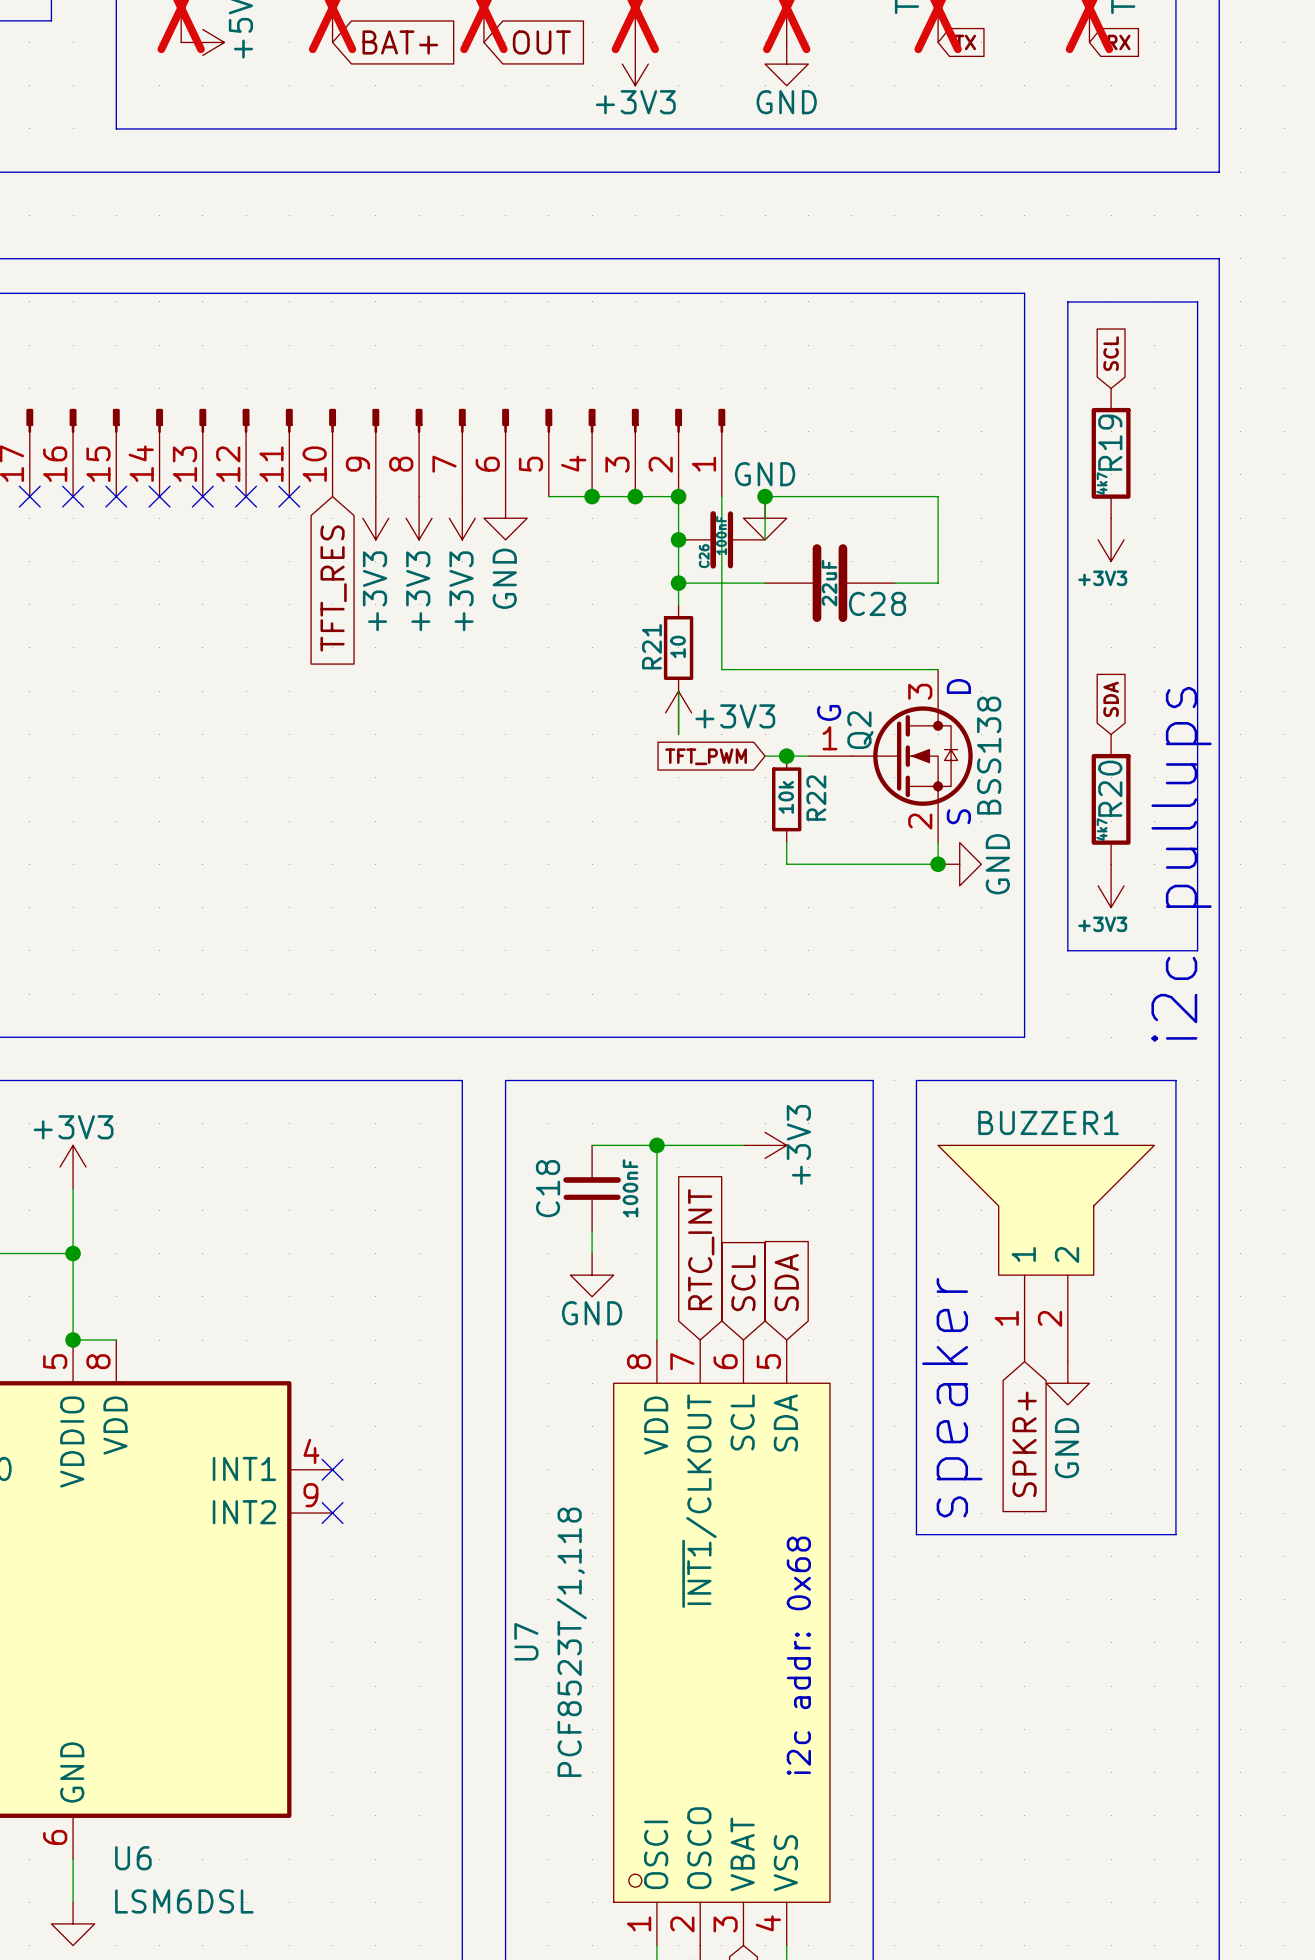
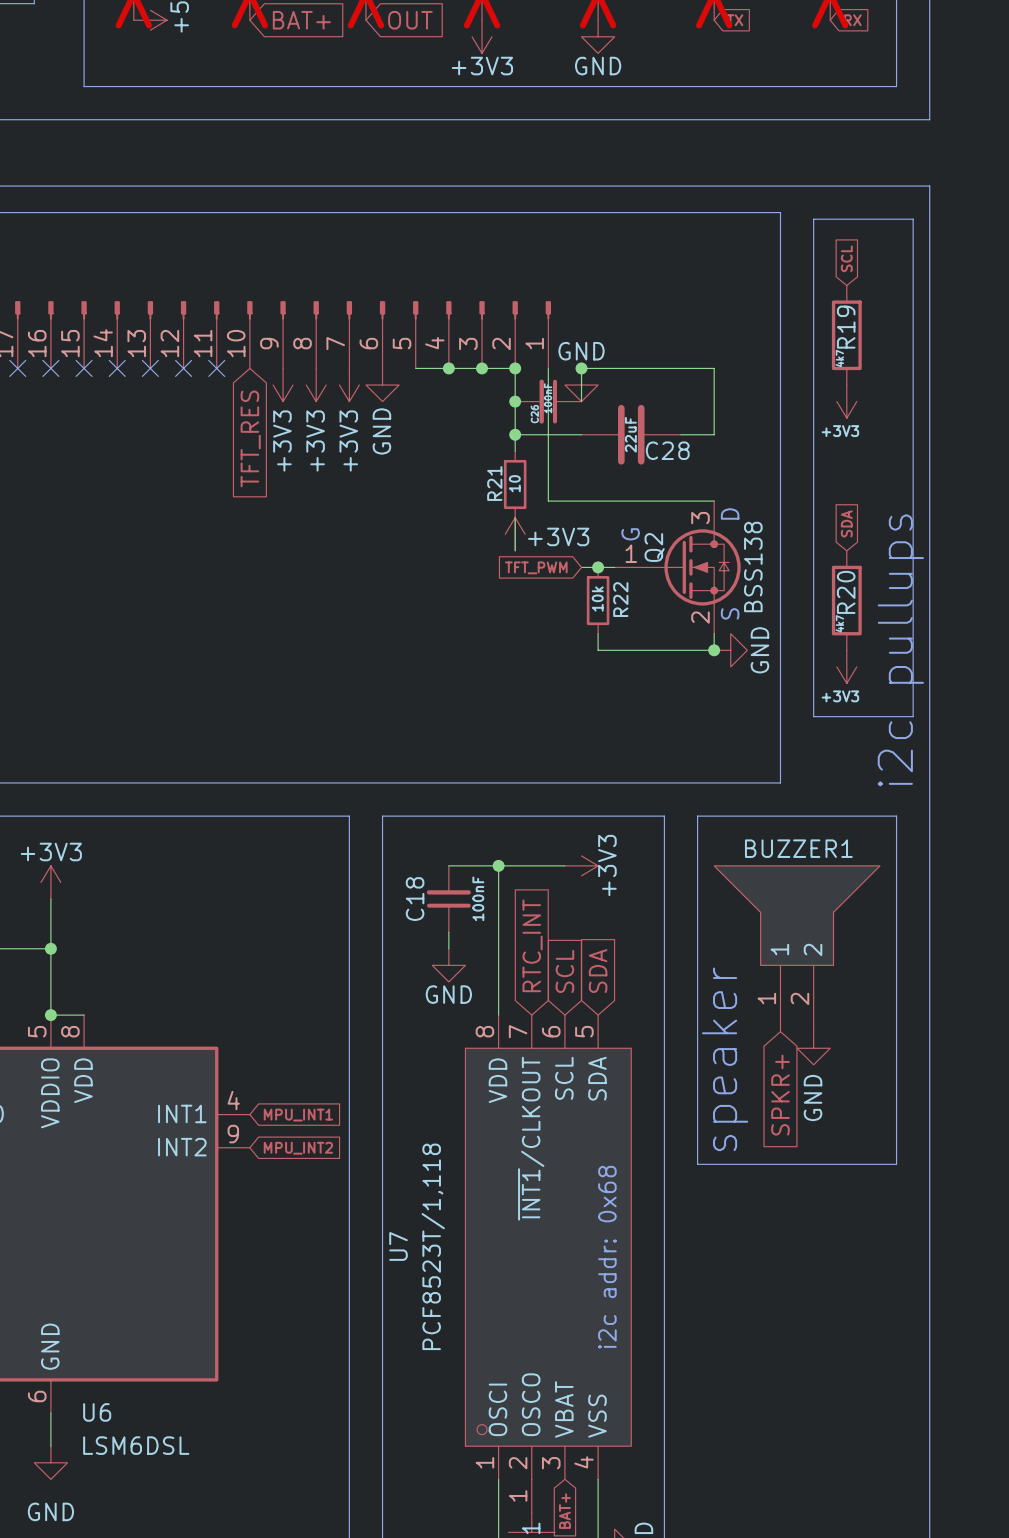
no-connect mark: (332, 1469) -> none
global label: none -> MPU_INT1 (298, 1115)
no-connect mark: (332, 1513) -> none
global label: none -> MPU_INT2 (298, 1148)

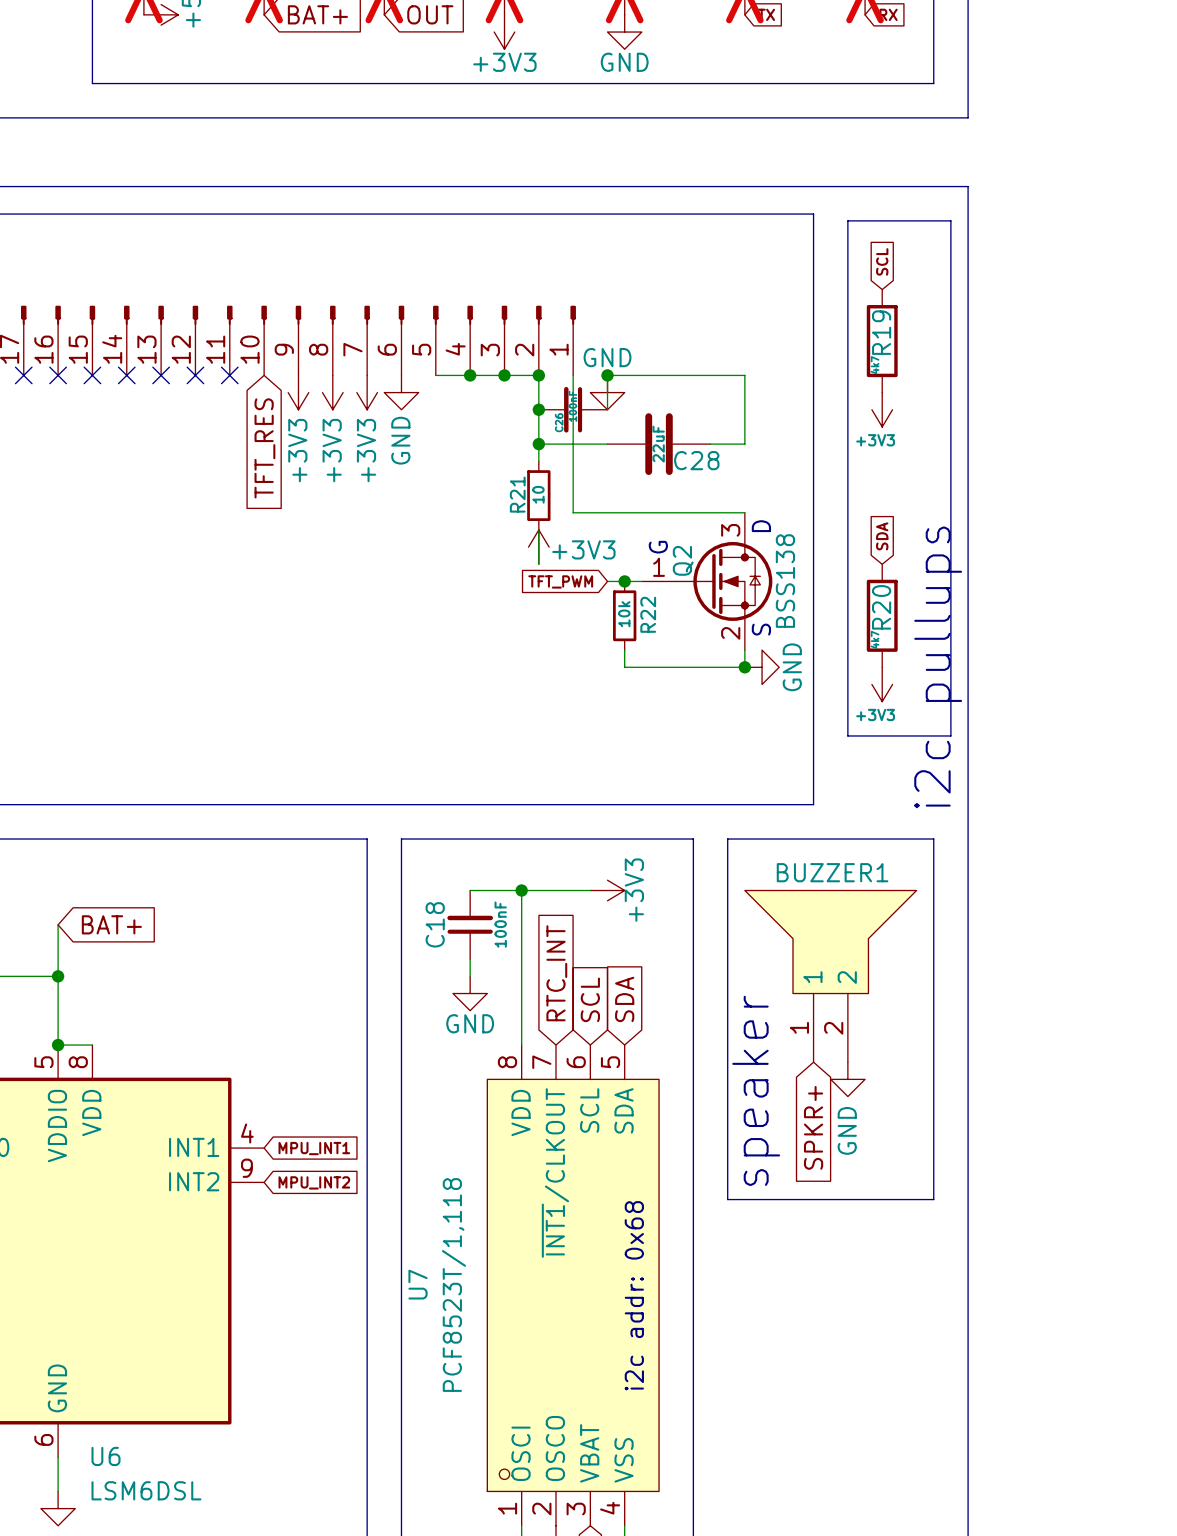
power symbol: +3V3 (50, 882) -> none
global label: none -> BAT+ (111, 924)

